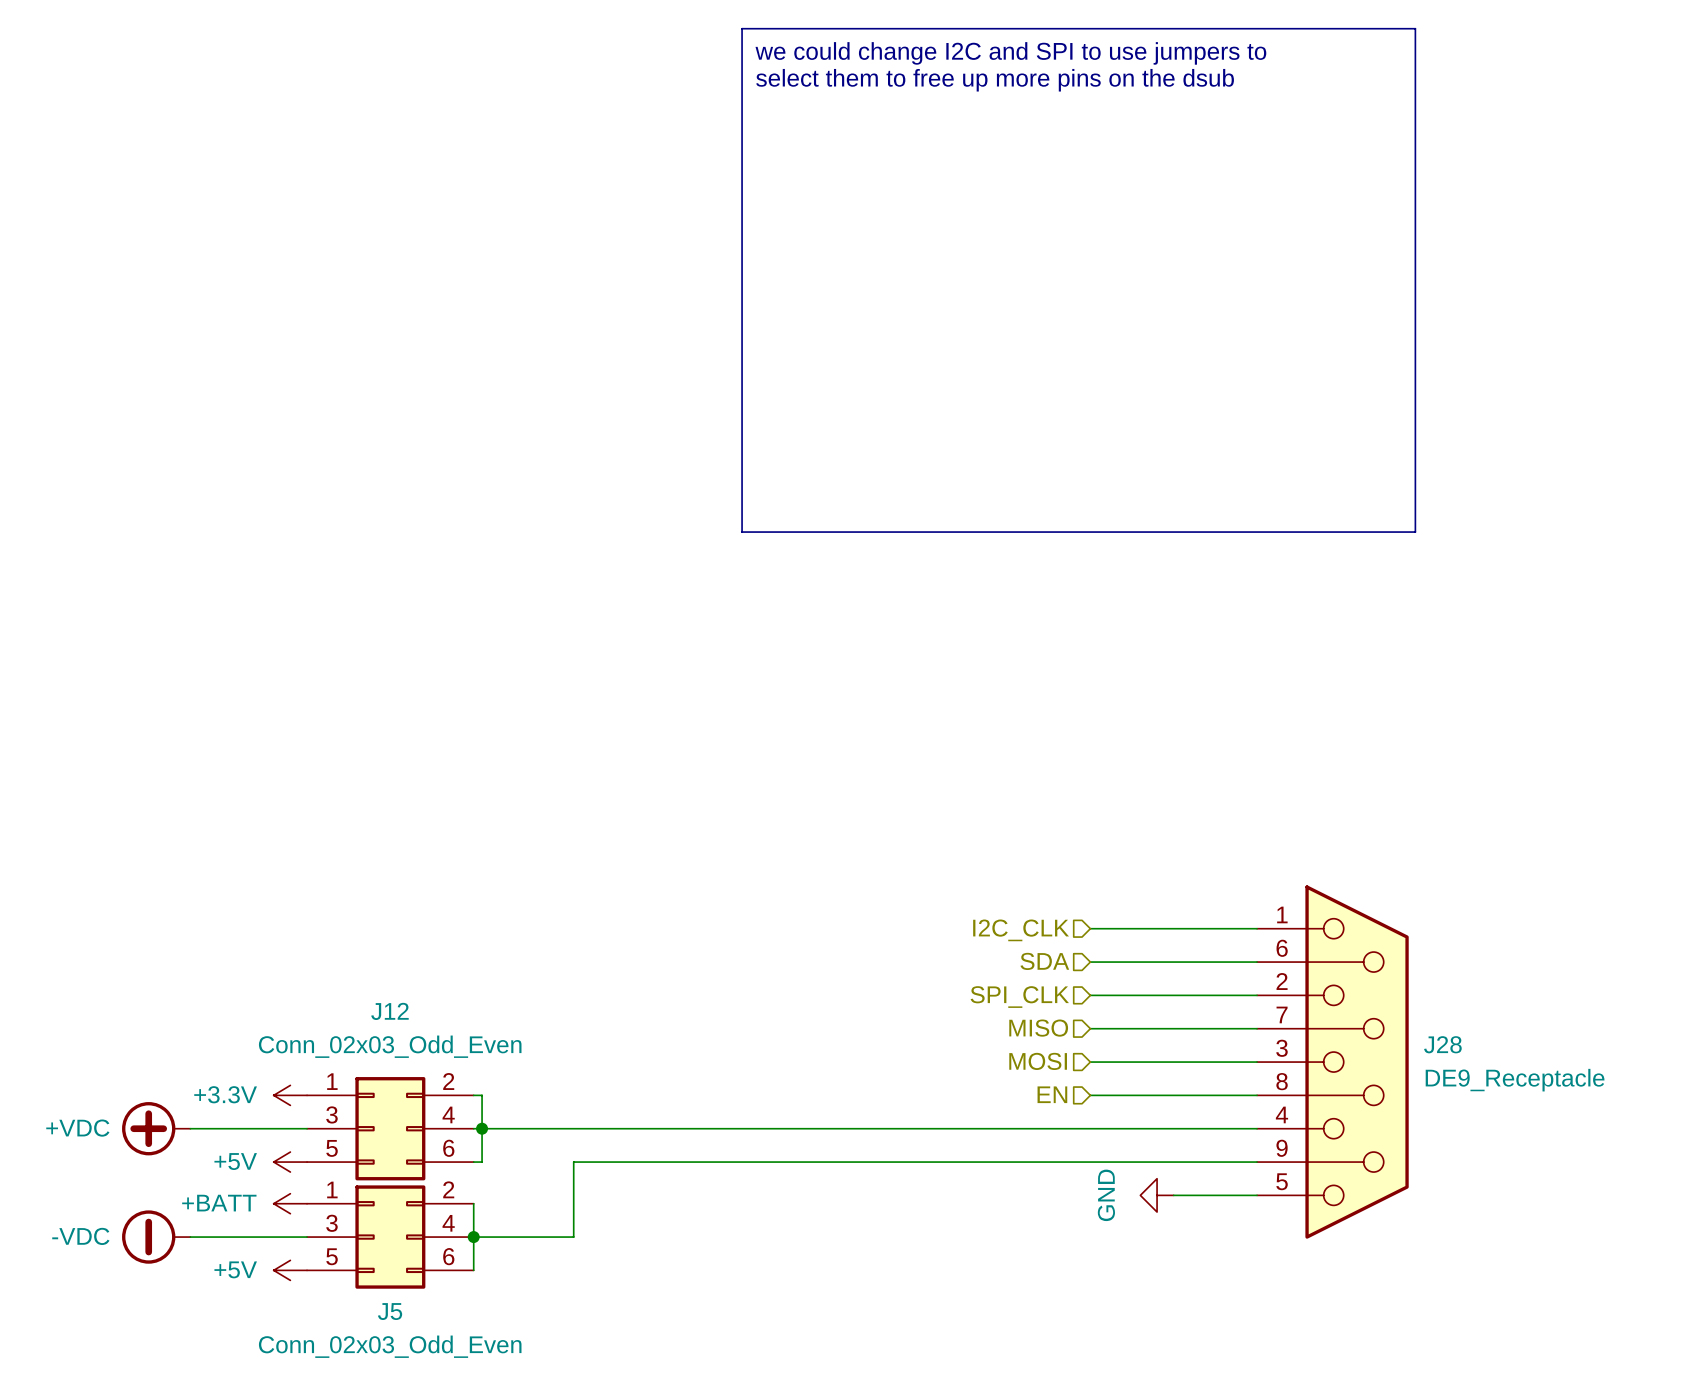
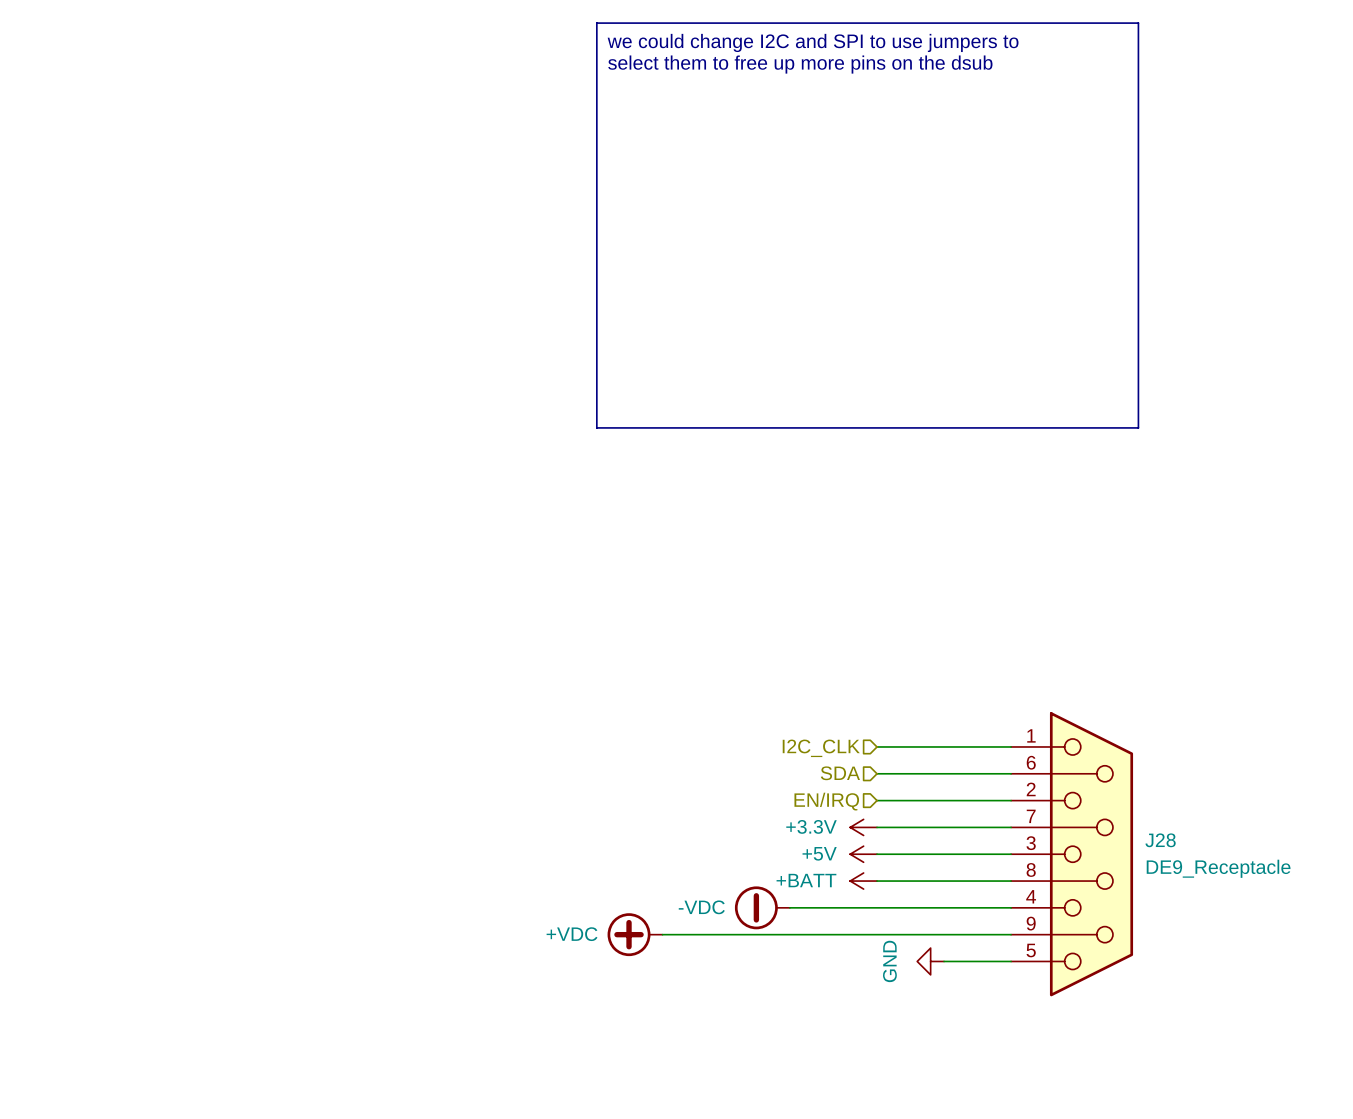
hierarchical label: SPI_CLK (1019, 997) -> EN/IRQ (826, 801)
hierarchical label: MISO (1038, 1028) -> none
power symbol: none -> +3.3V (863, 827)
hierarchical label: MOSI (1038, 1061) -> none
power symbol: none -> +5V (863, 854)
hierarchical label: EN (1052, 1094) -> none
power symbol: +3.3V (290, 1095) -> none
wire: (473, 1095) (482, 1095) (482, 1162) (473, 1162) -> none
power symbol: none -> +BATT (863, 881)
power symbol: +VDC (156, 1128) -> none
wire: (190, 1128) (307, 1128) -> none
J12: Conn_02x03_Odd_Even (390, 1128) -> none
wire: (473, 1128) (982, 1128) -> none
junction: (482, 1128) -> none
power symbol: none -> -VDC (762, 907)
power symbol: +5V (290, 1162) -> none
power symbol: none -> +VDC (635, 934)
wire: (823, 1162) (573, 1162) (573, 1237) (473, 1237) -> none
power symbol: +BATT (290, 1203) -> none
wire: (473, 1203) (473, 1270) -> none
power symbol: -VDC (156, 1237) -> none
wire: (190, 1237) (307, 1237) -> none
J5: Conn_02x03_Odd_Even (390, 1237) -> none
junction: (473, 1237) -> none
power symbol: +5V (290, 1270) -> none

